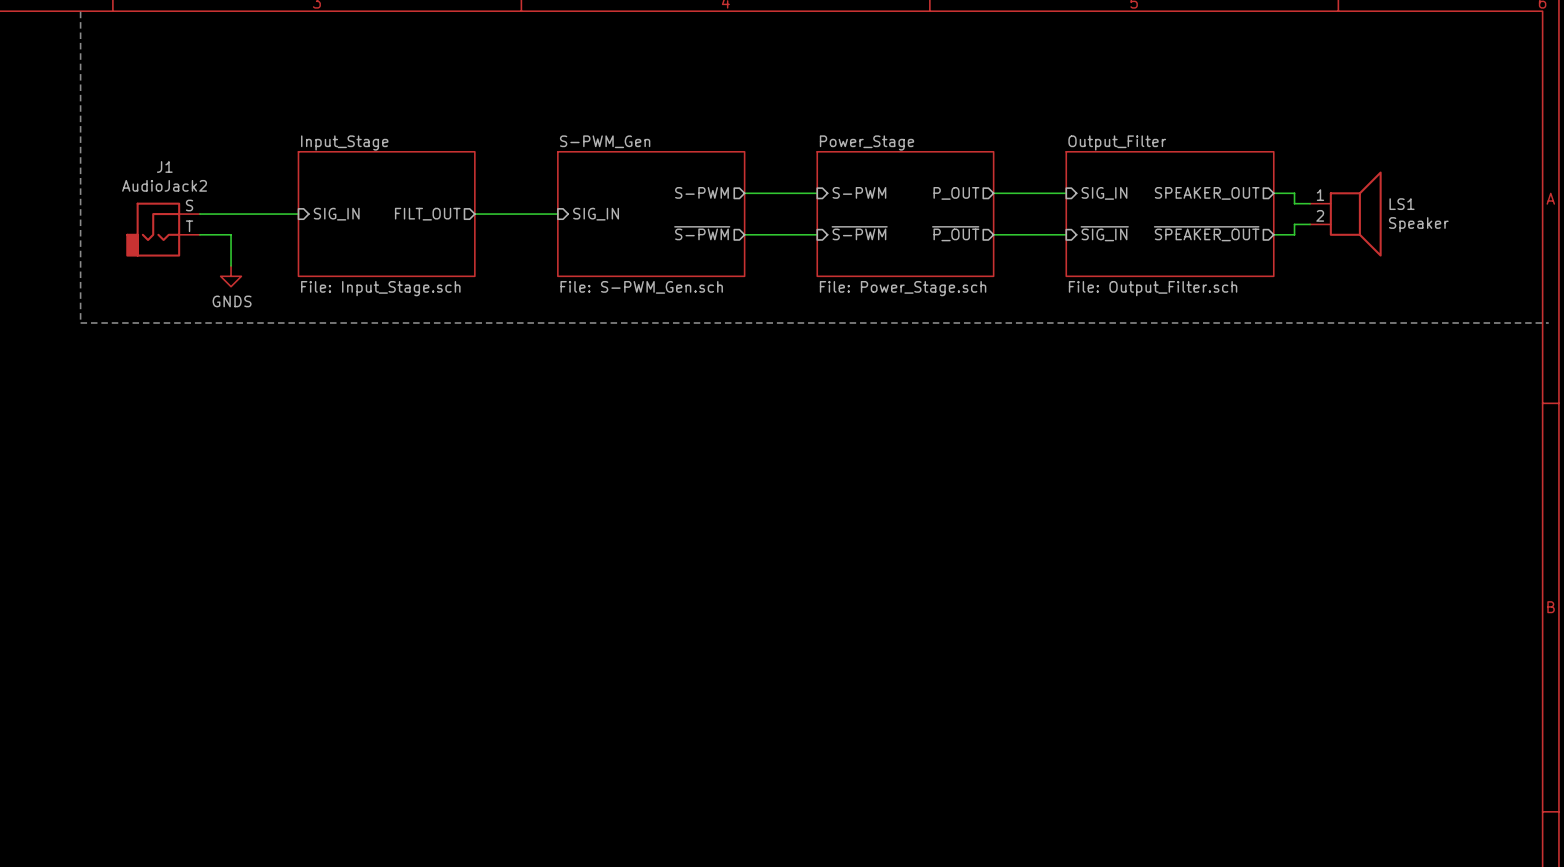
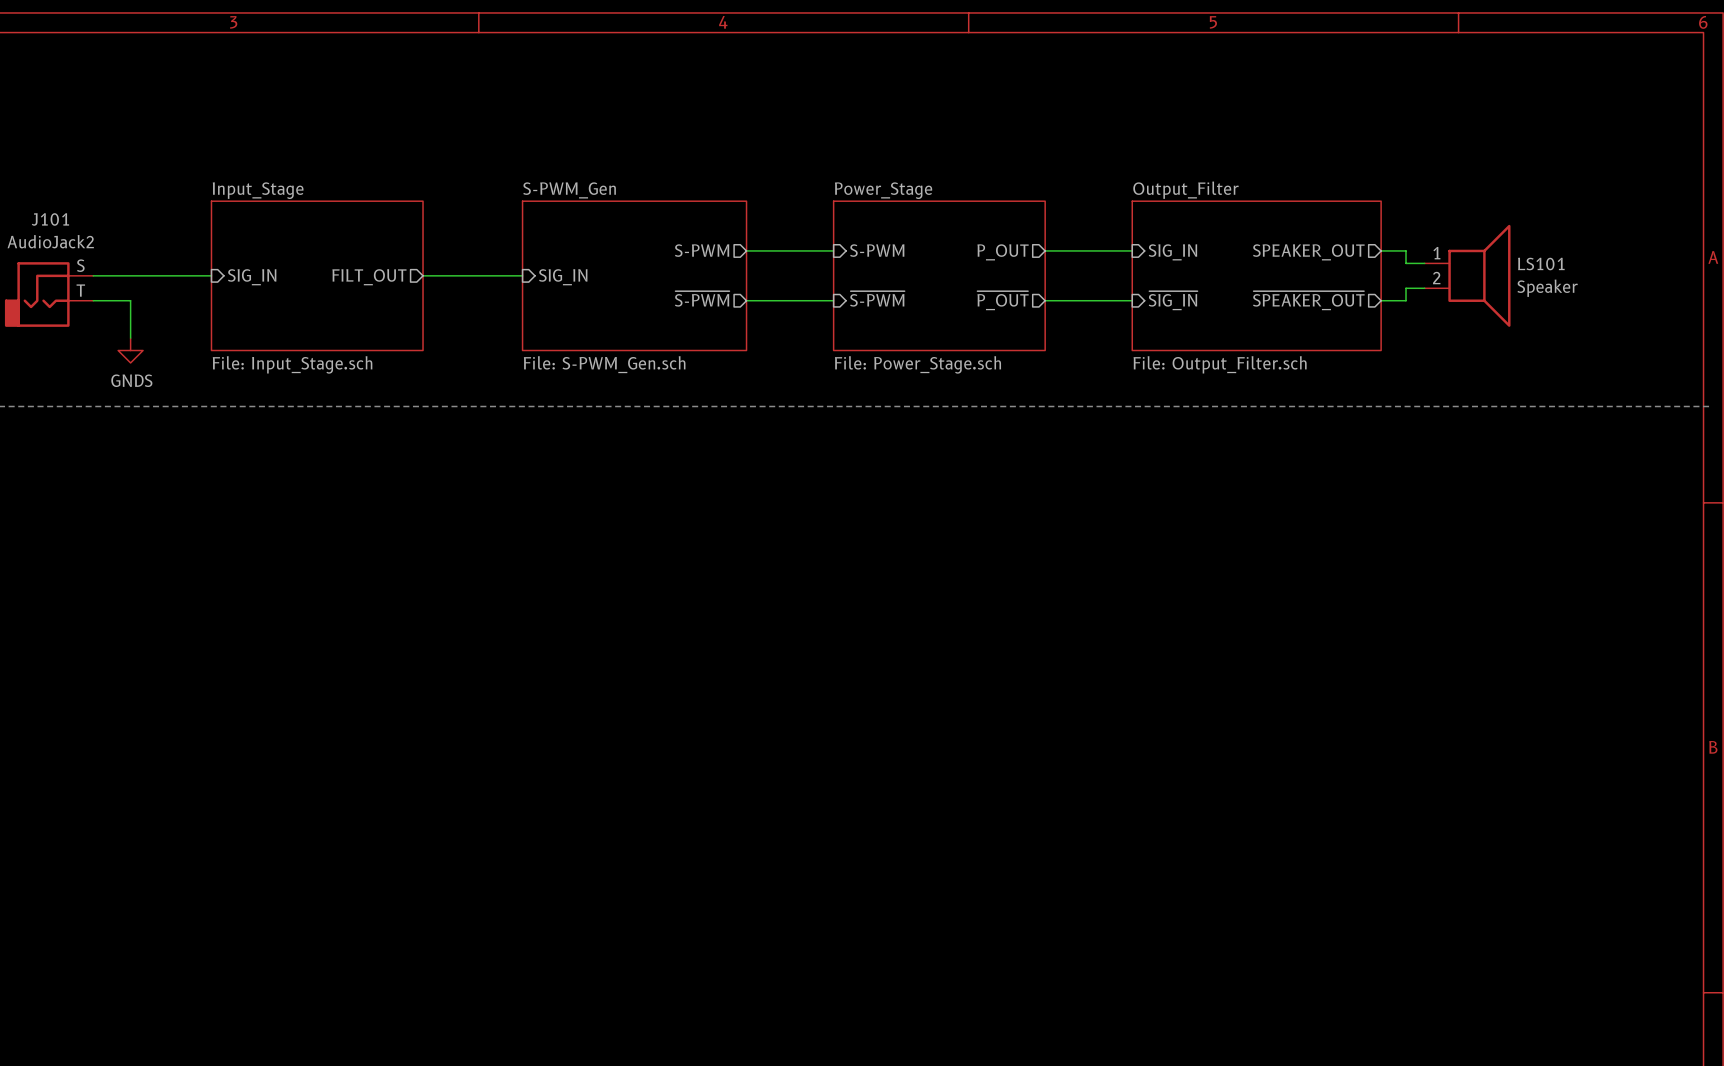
J1 name: J1 (164, 166) -> J101 (50, 219)
LS1 name: LS1 (1402, 204) -> LS101 (1541, 264)

